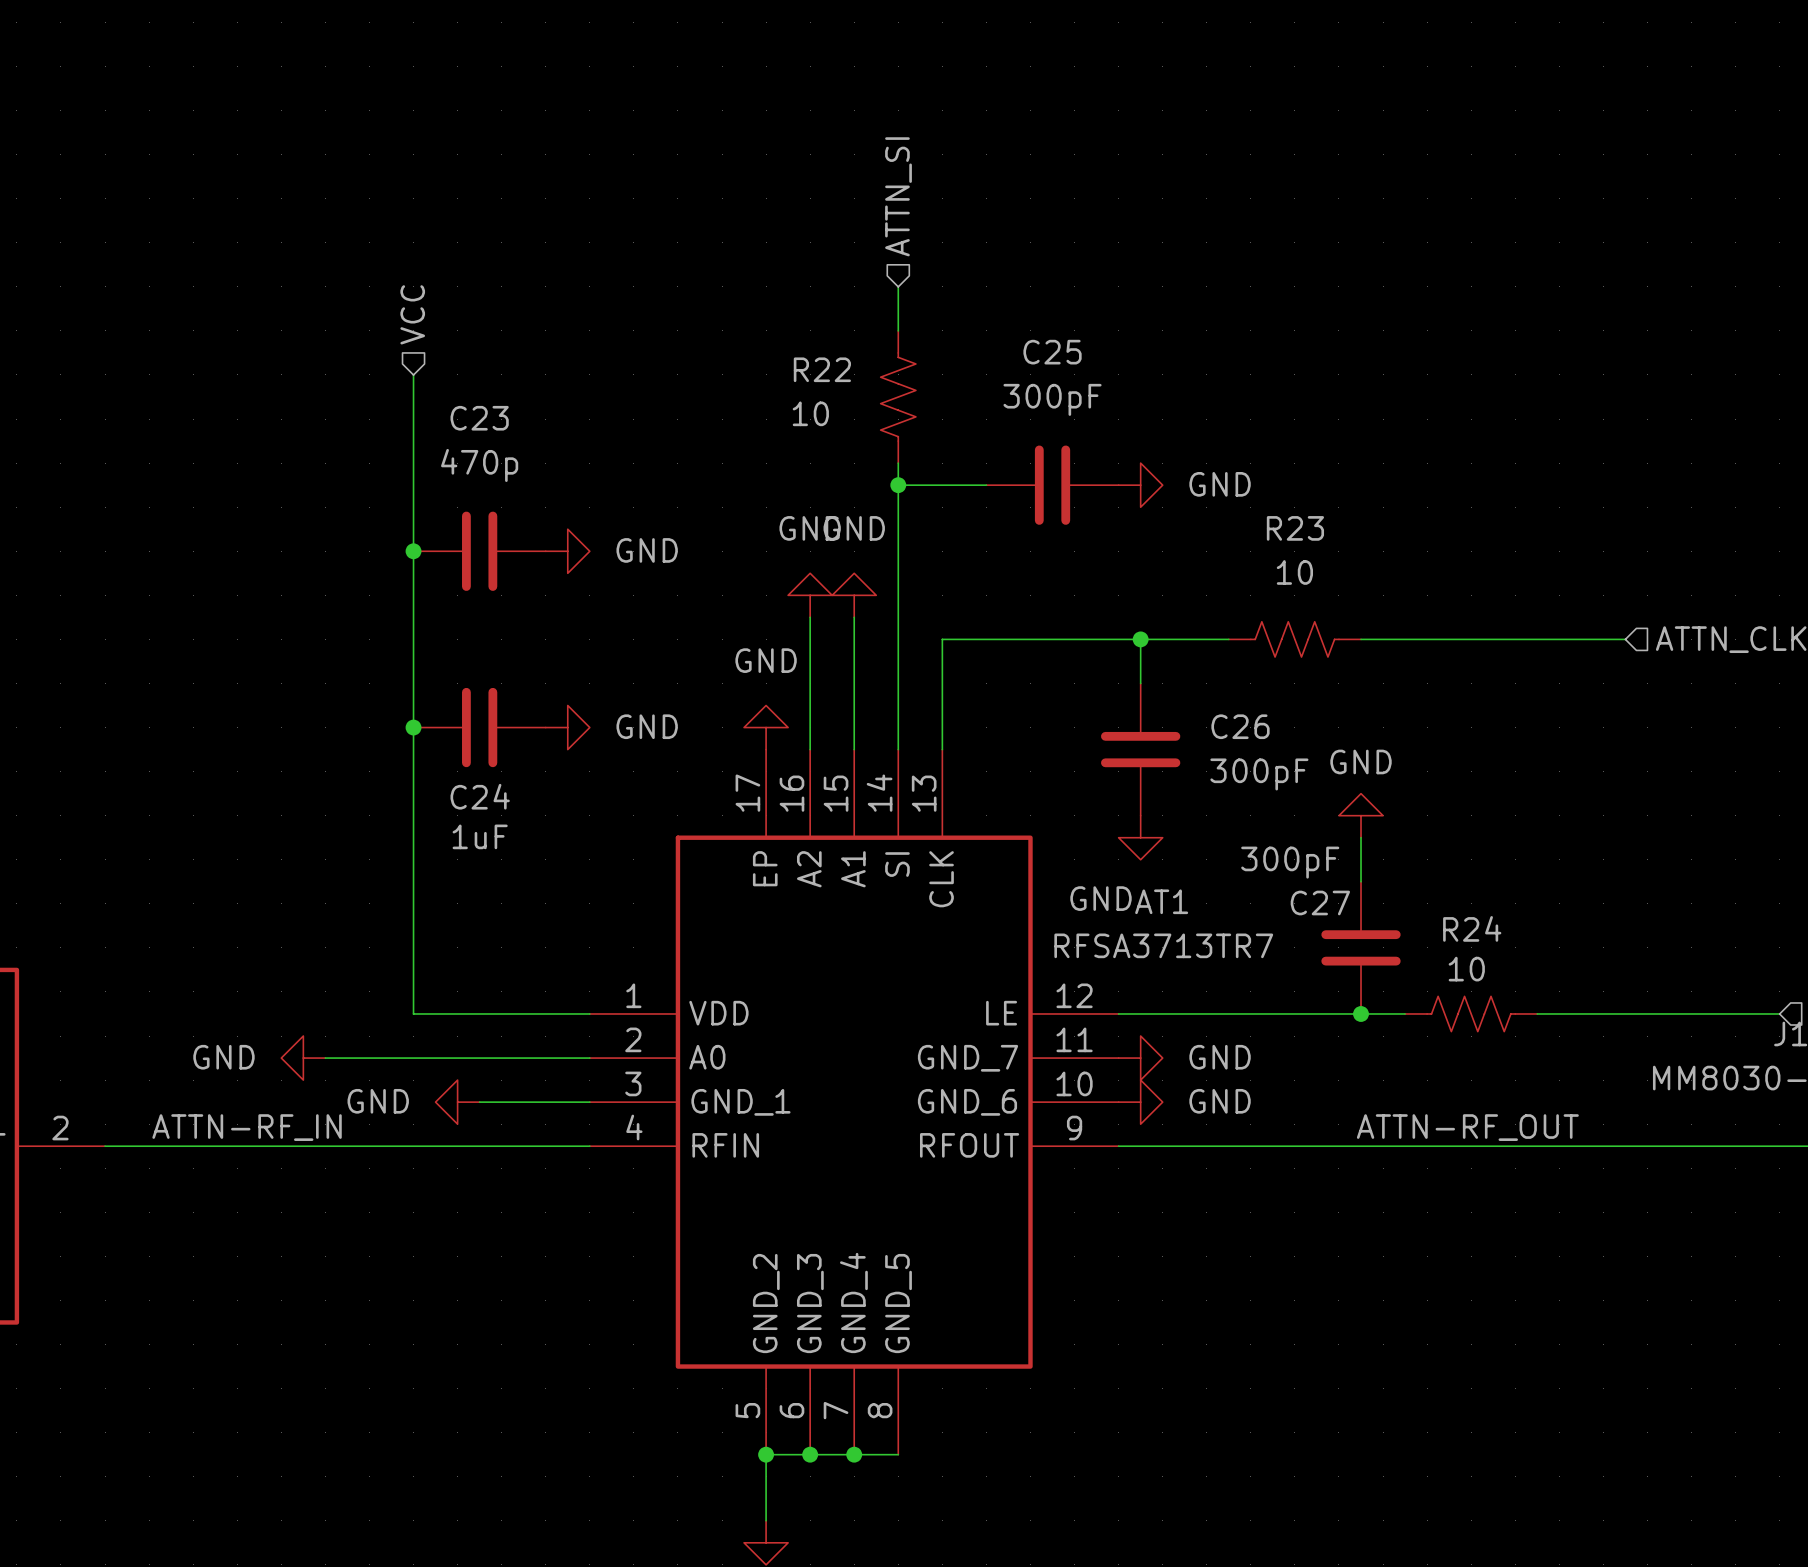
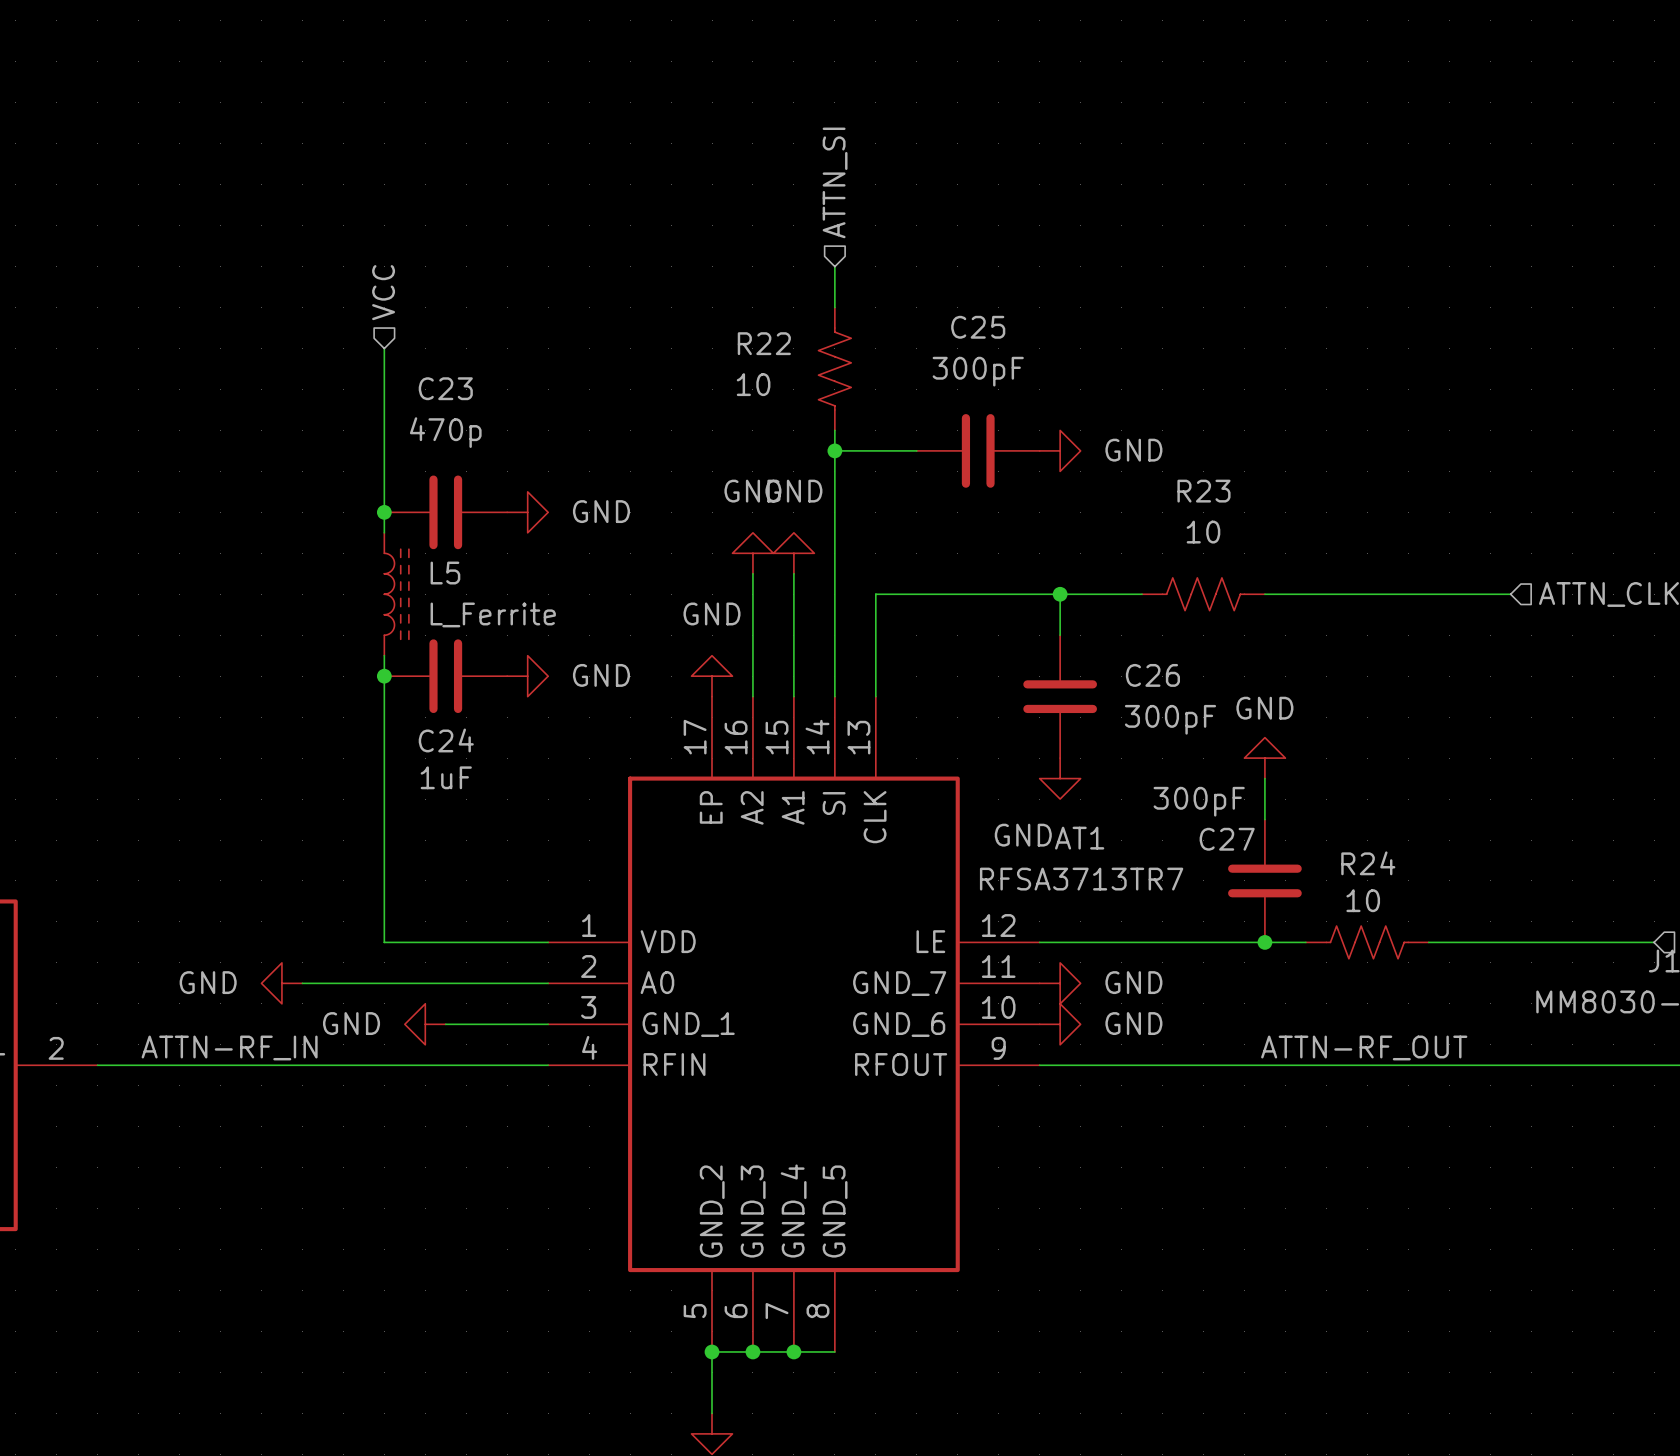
wire: (413, 573) (413, 705) -> none
L5: none -> L_Ferrite (396, 594)

